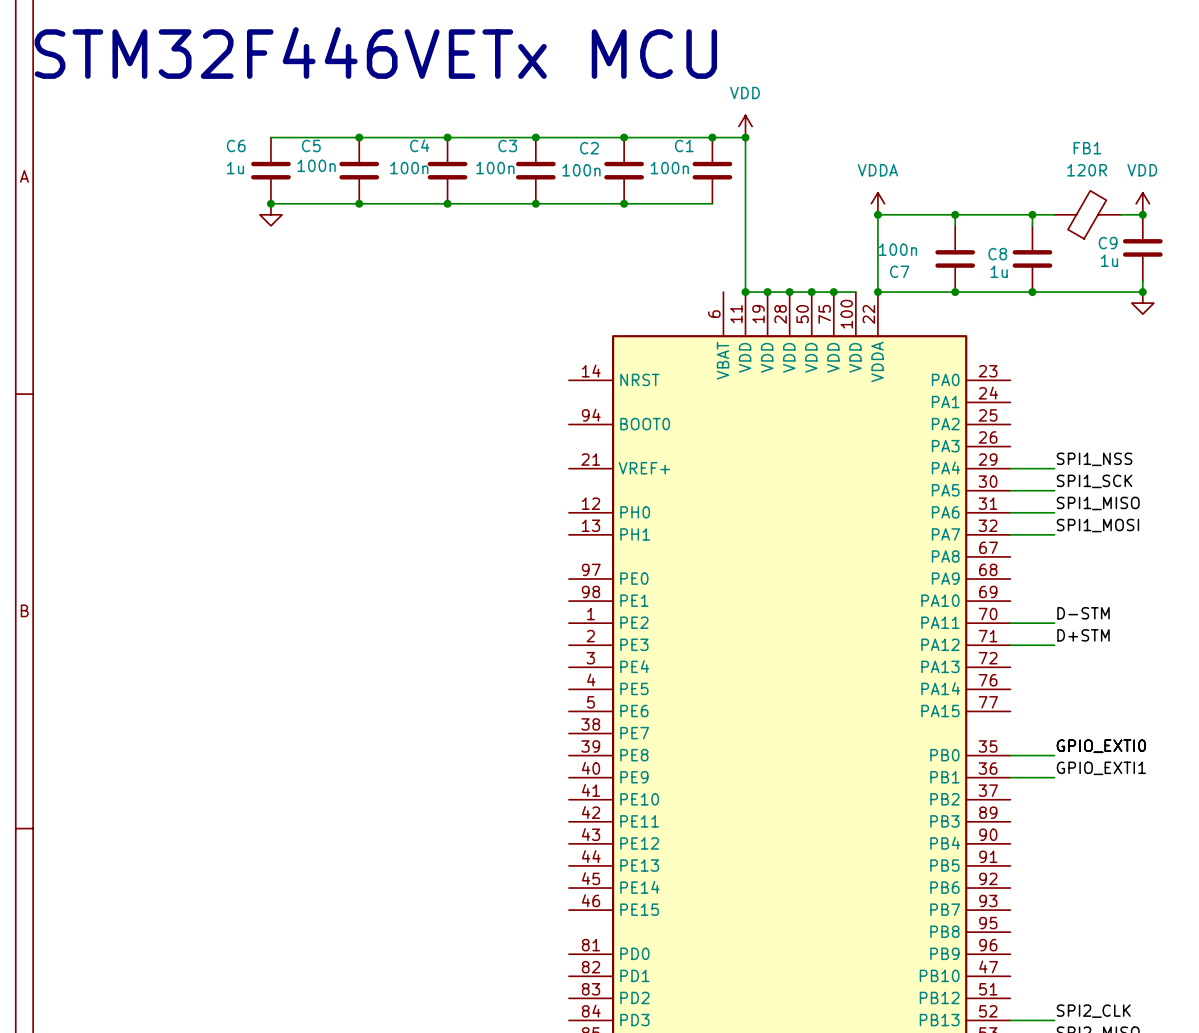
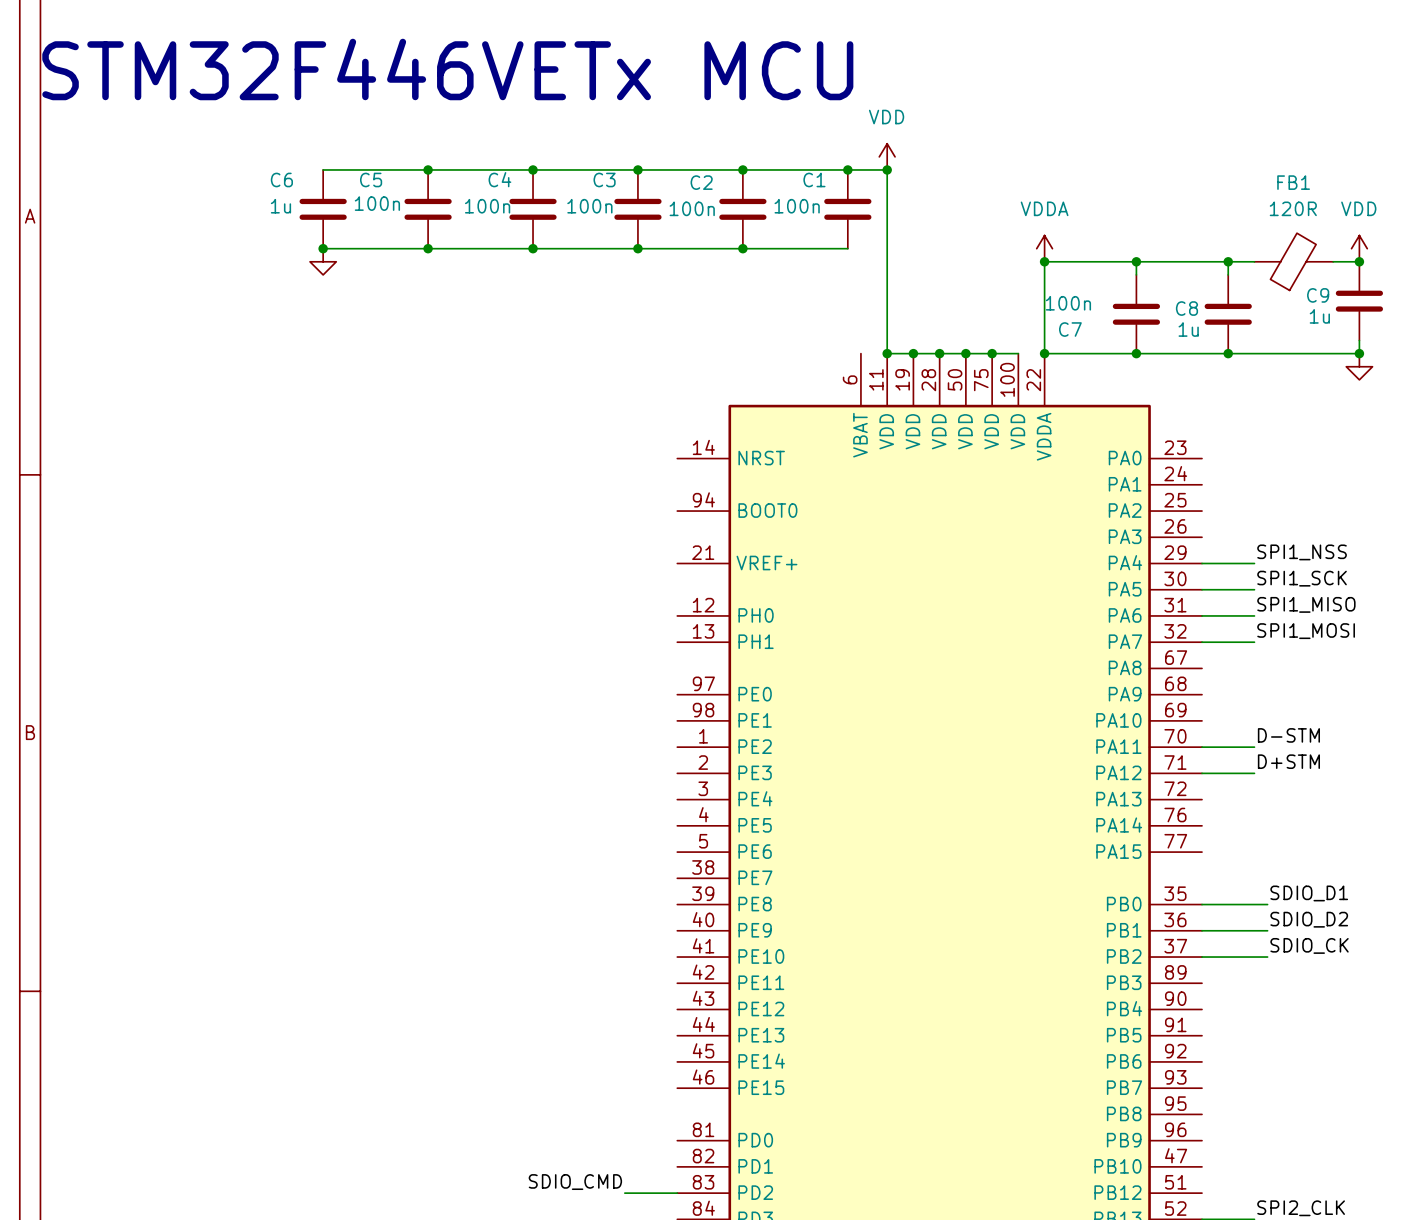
label: none -> SDIO_D1 (1309, 893)
label: GPIO_EXTI0 (1101, 746) -> none
wire: none -> (1254, 904) (1267, 904)
label: none -> SDIO_D2 (1309, 919)
label: GPIO_EXTI1 (1101, 768) -> none
wire: none -> (1254, 930) (1267, 930)
label: none -> SDIO_CK (1309, 945)
wire: none -> (1201, 957) (1267, 957)
label: none -> SDIO_CMD (575, 1182)
wire: none -> (624, 1193) (677, 1193)

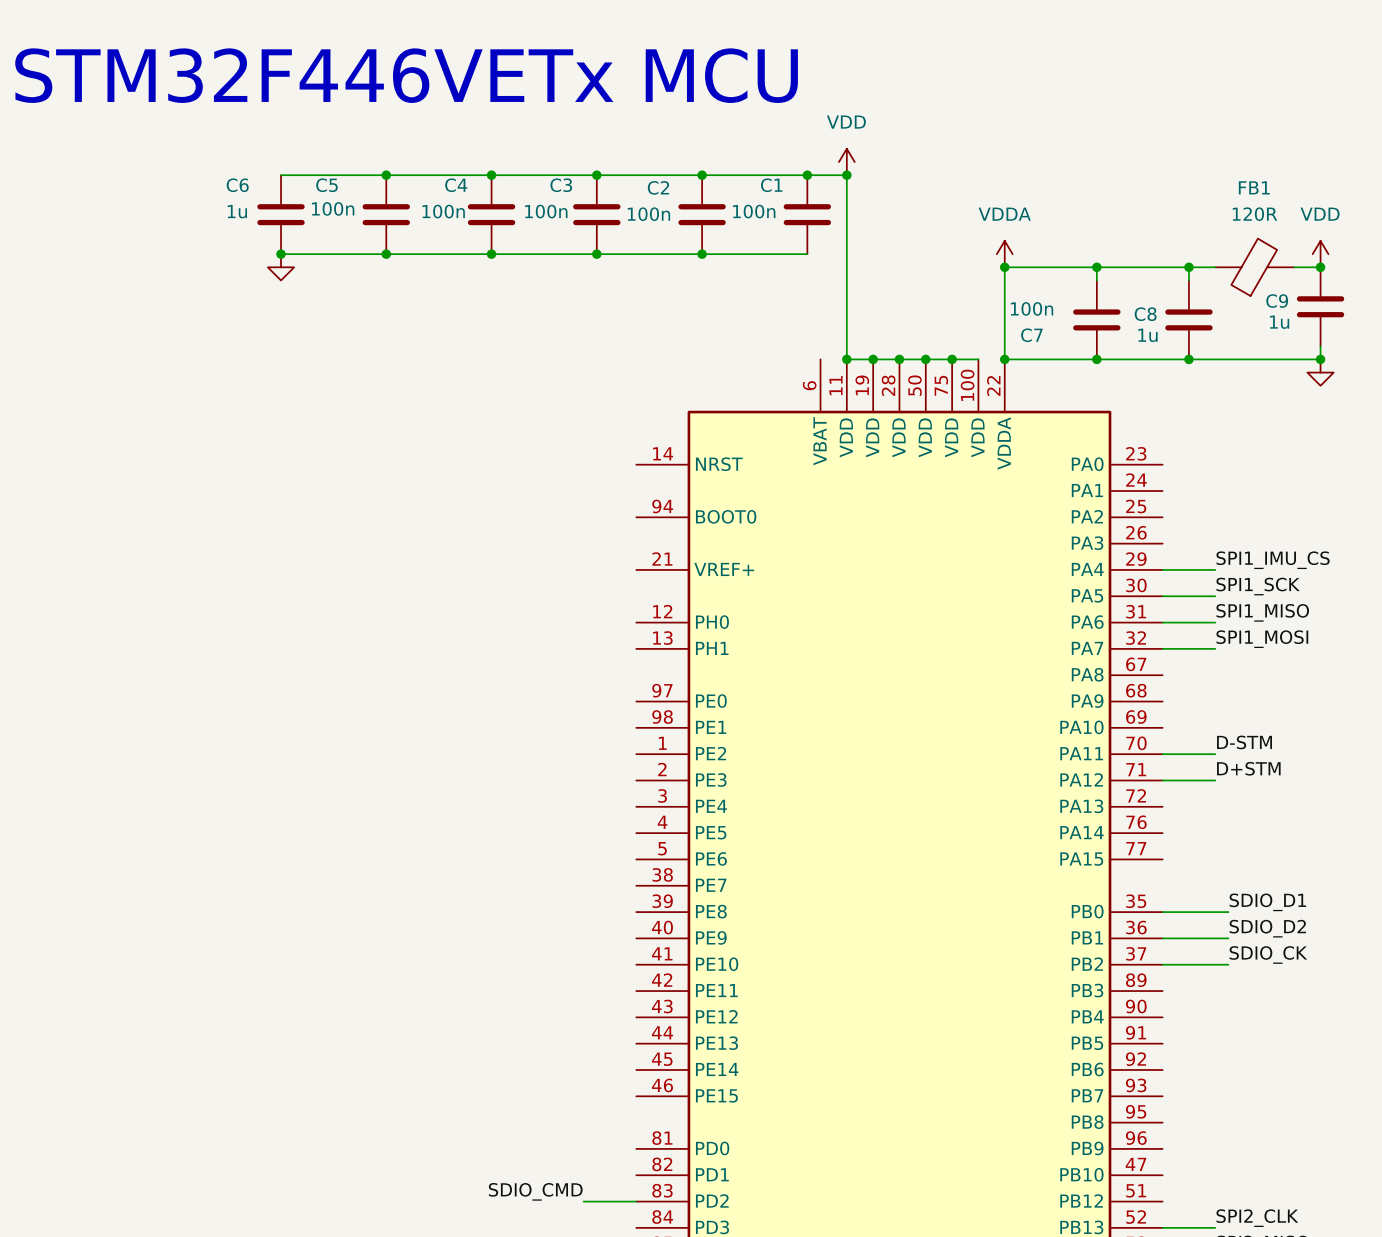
label: SPI1_NSS (1302, 552) -> SPI1_IMU_CS (1273, 560)

